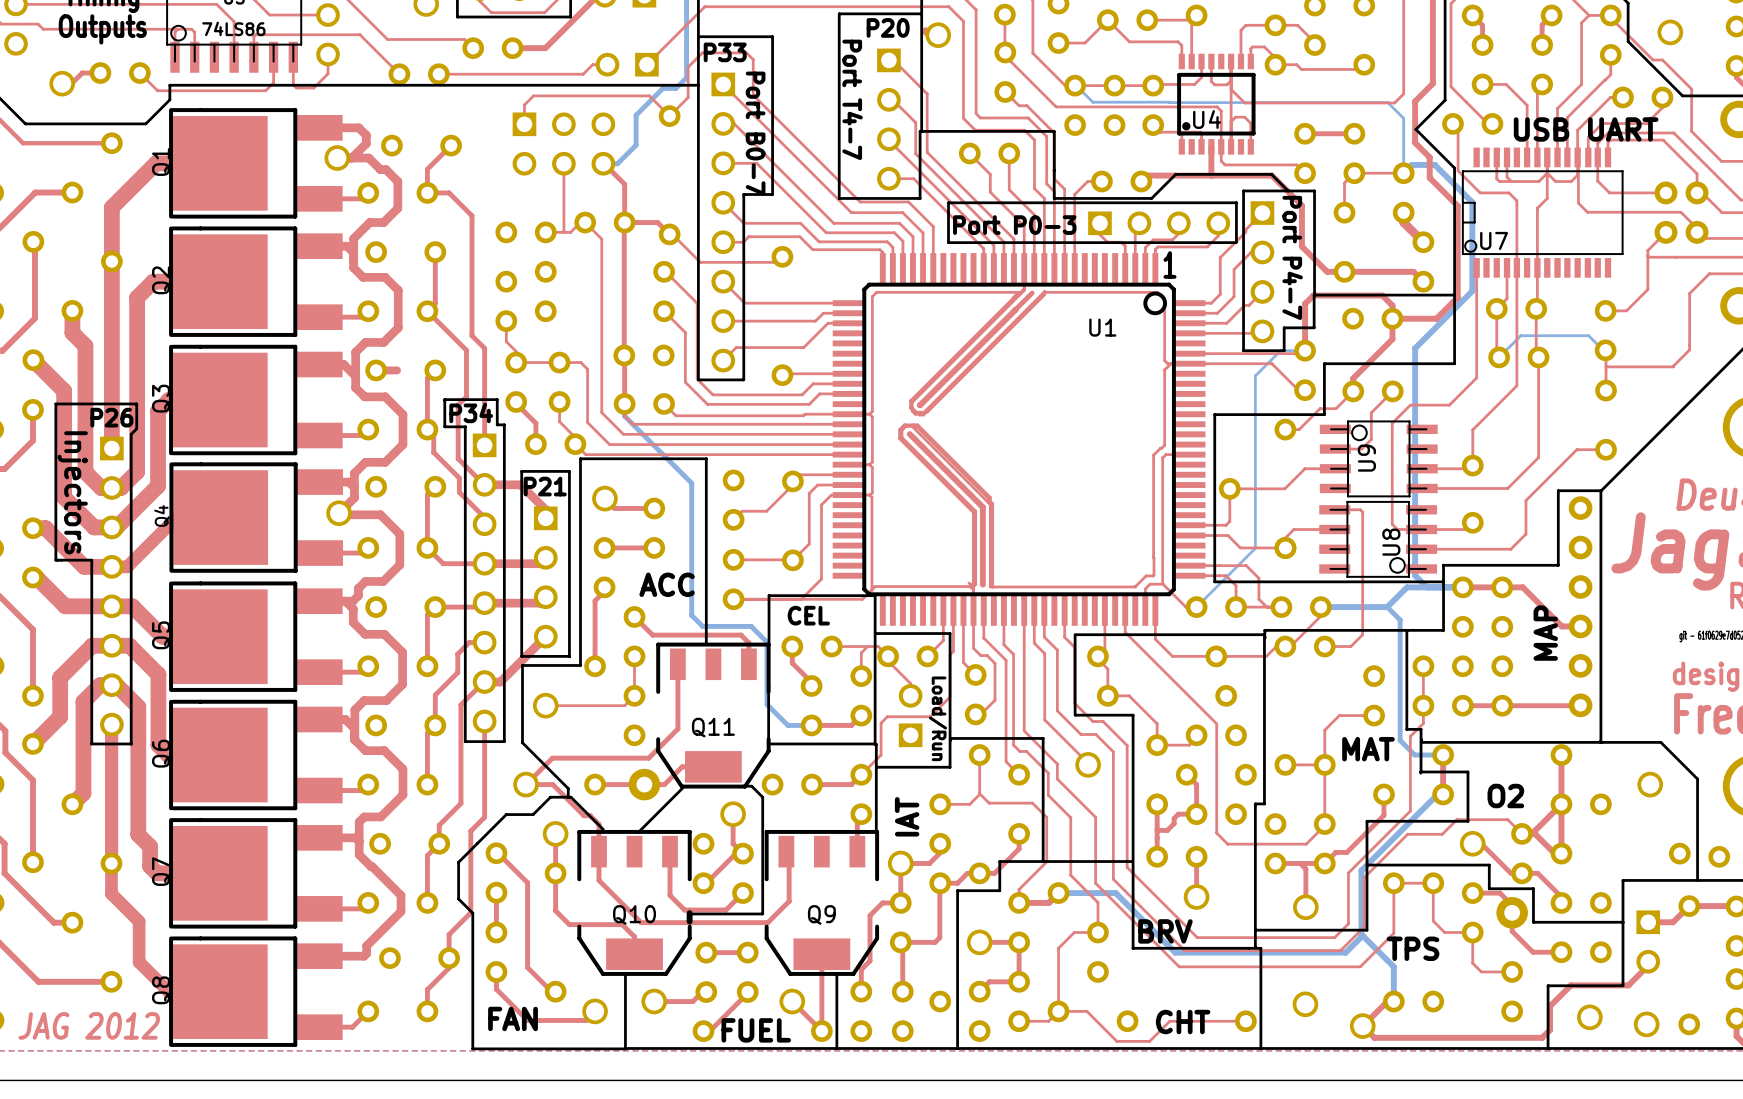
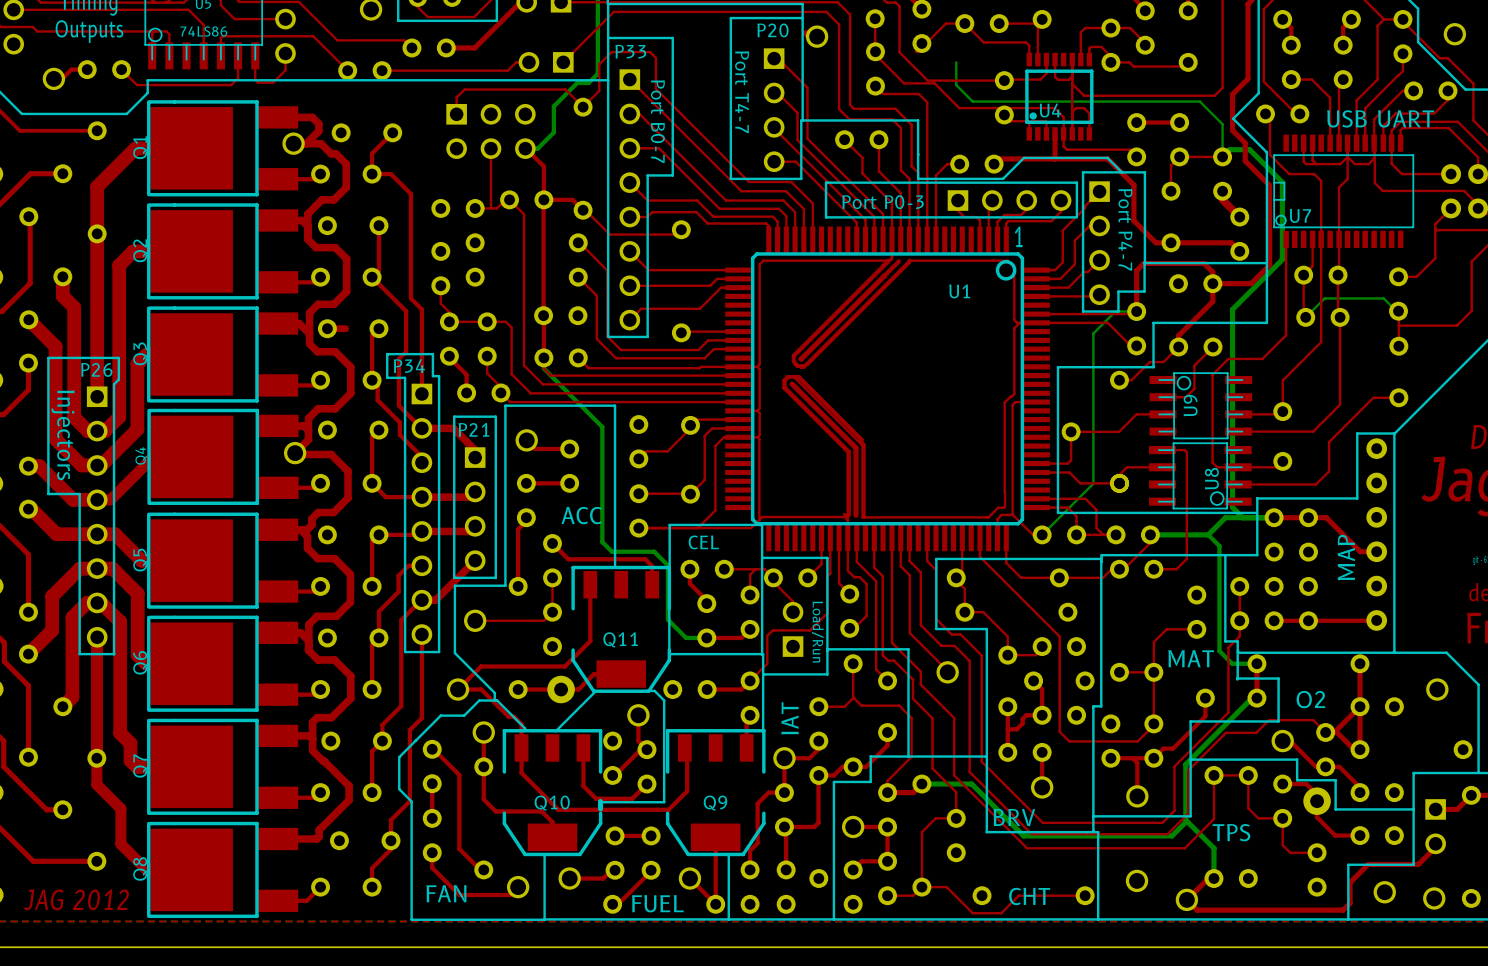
top track: (1107, 20) (1084, 43) (1058, 43) -> (964, 23) (945, 23) (915, 51)
bottom track: (1075, 85) (1092, 102) (1387, 102) (1403, 118) (1403, 135) -> (956, 62) (956, 85) (972, 101) (1199, 101) (1222, 124)
top track: (1038, 88) (1056, 106) (1217, 106) (1221, 111) (1221, 127) -> (904, 83) (934, 83) (959, 108) (1054, 108) (1063, 117)
top track: (1014, 101) (1019, 105) (1026, 105) (1054, 133) (1054, 179) (1064, 189) -> (883, 94) (918, 94) (927, 102) (927, 170)
part: (1075, 105) -> none
part: (1114, 105) -> none

